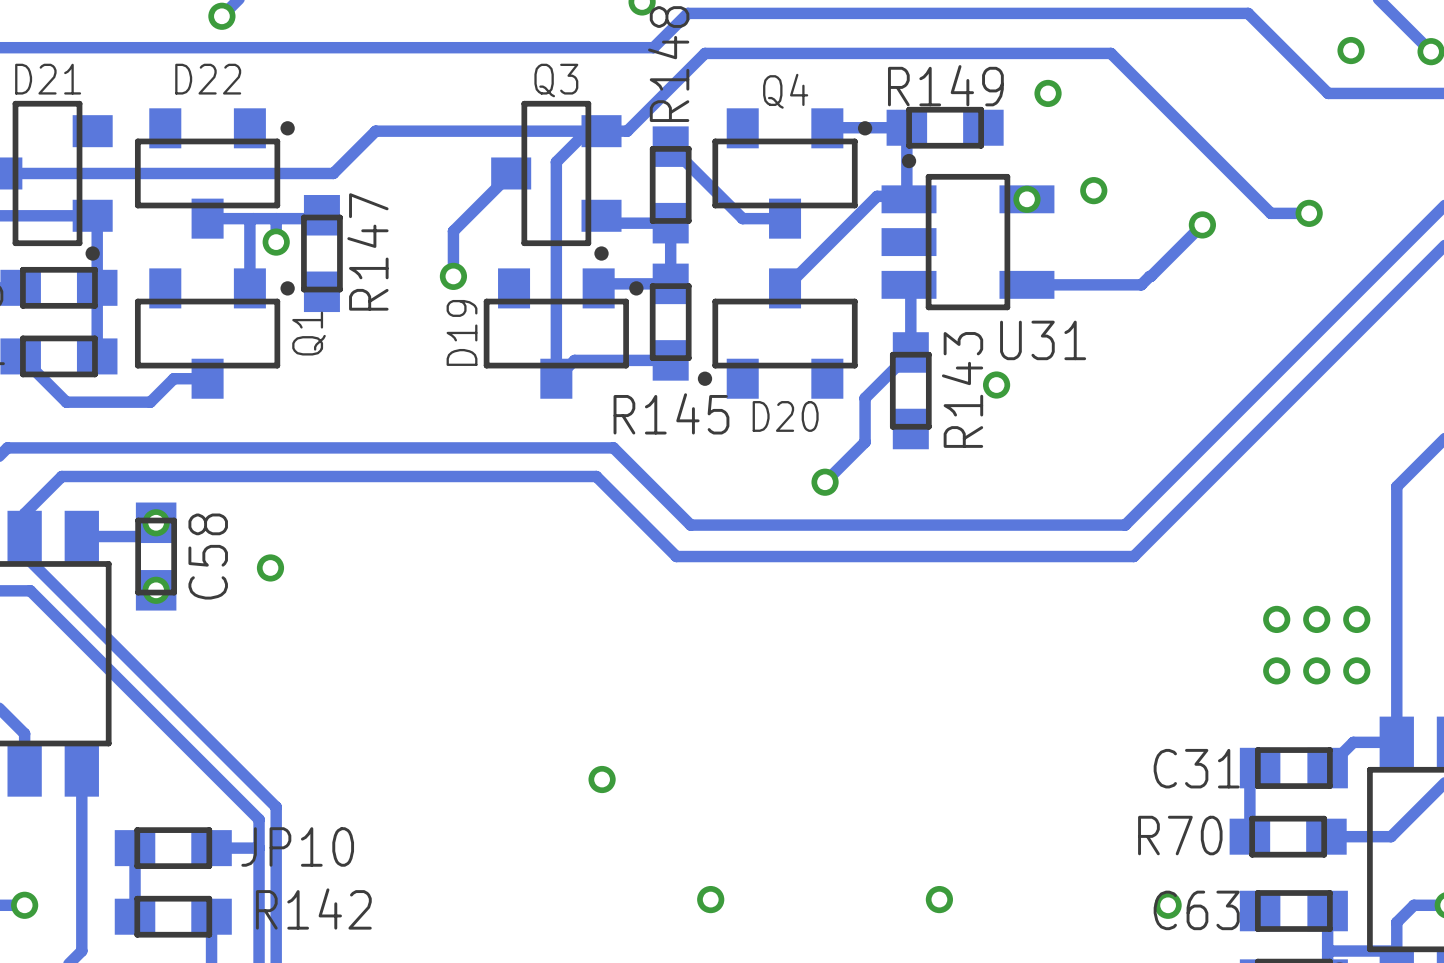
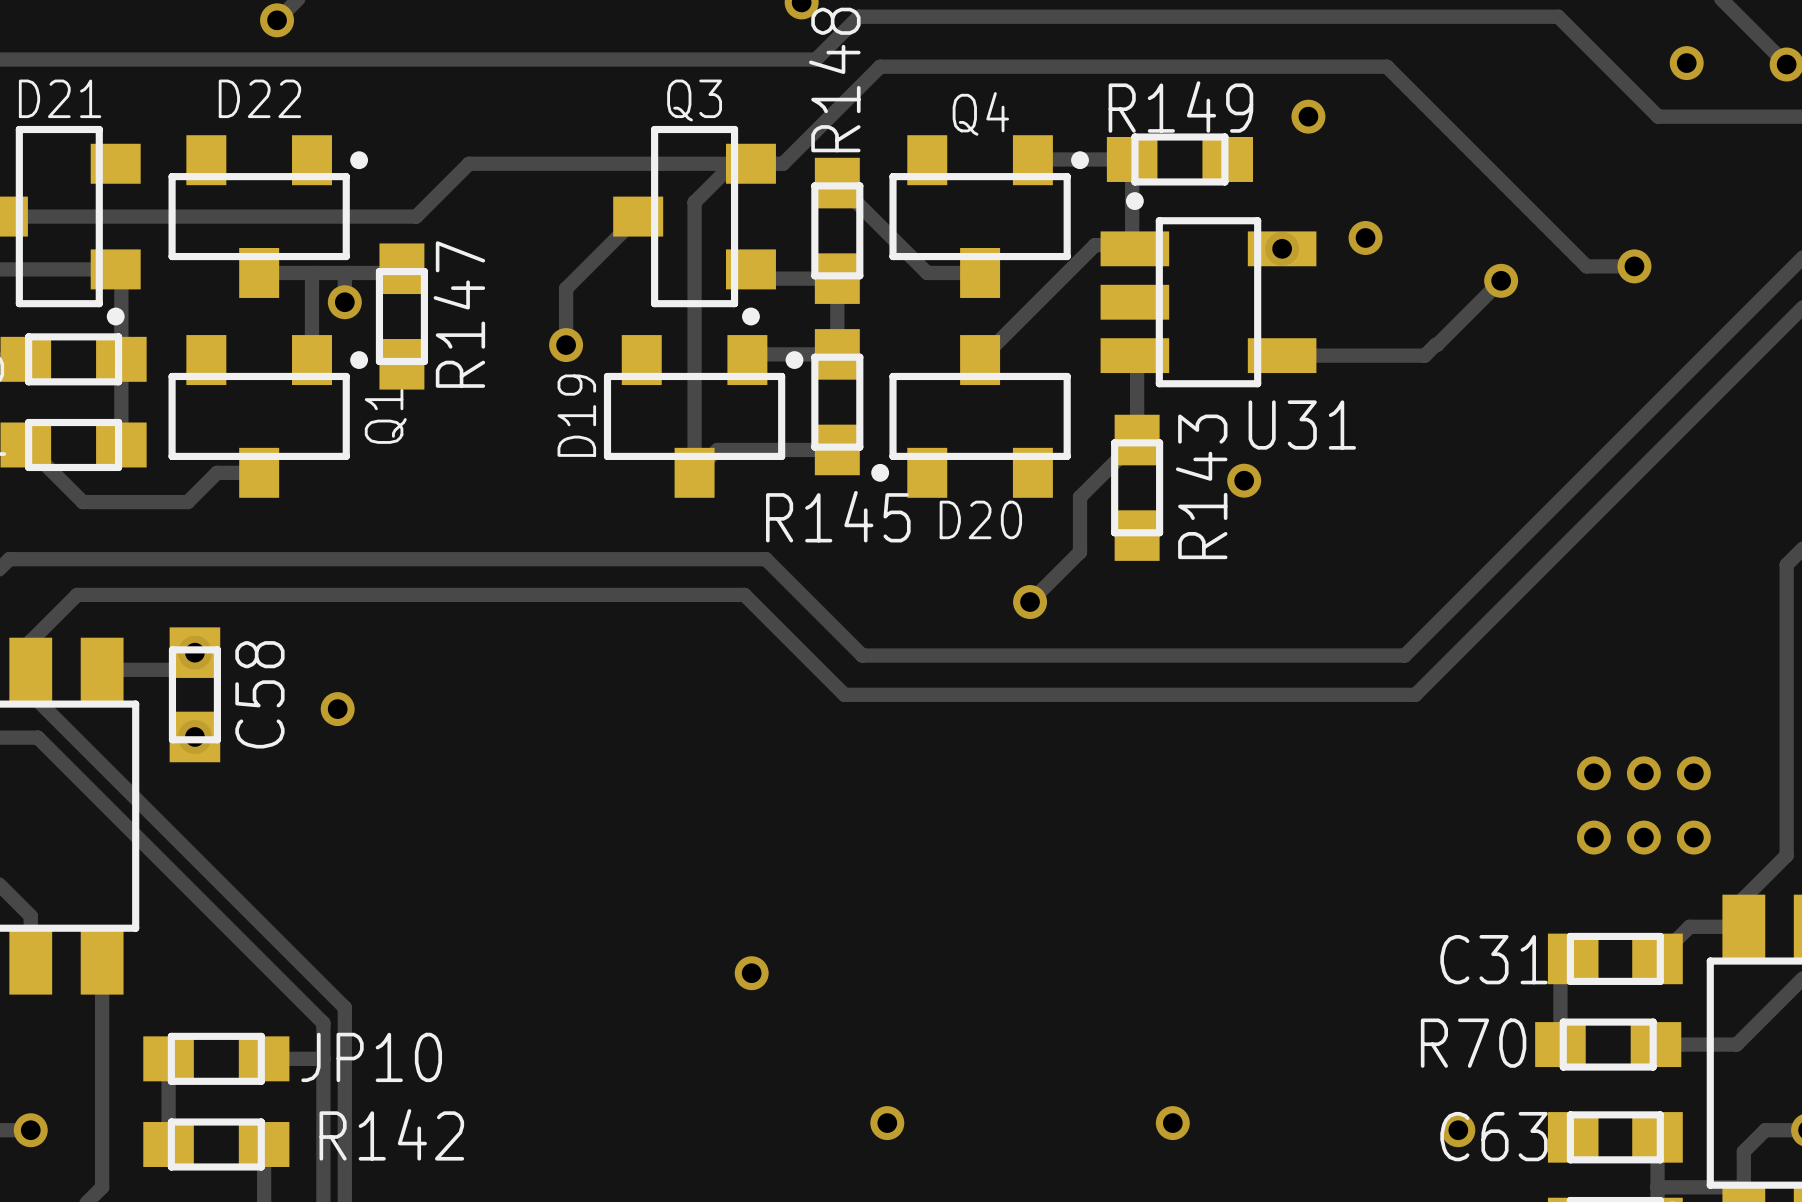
track: (1431, 452) (1396, 486) (1396, 719) -> (1786, 564) (1786, 855) (1743, 898)

